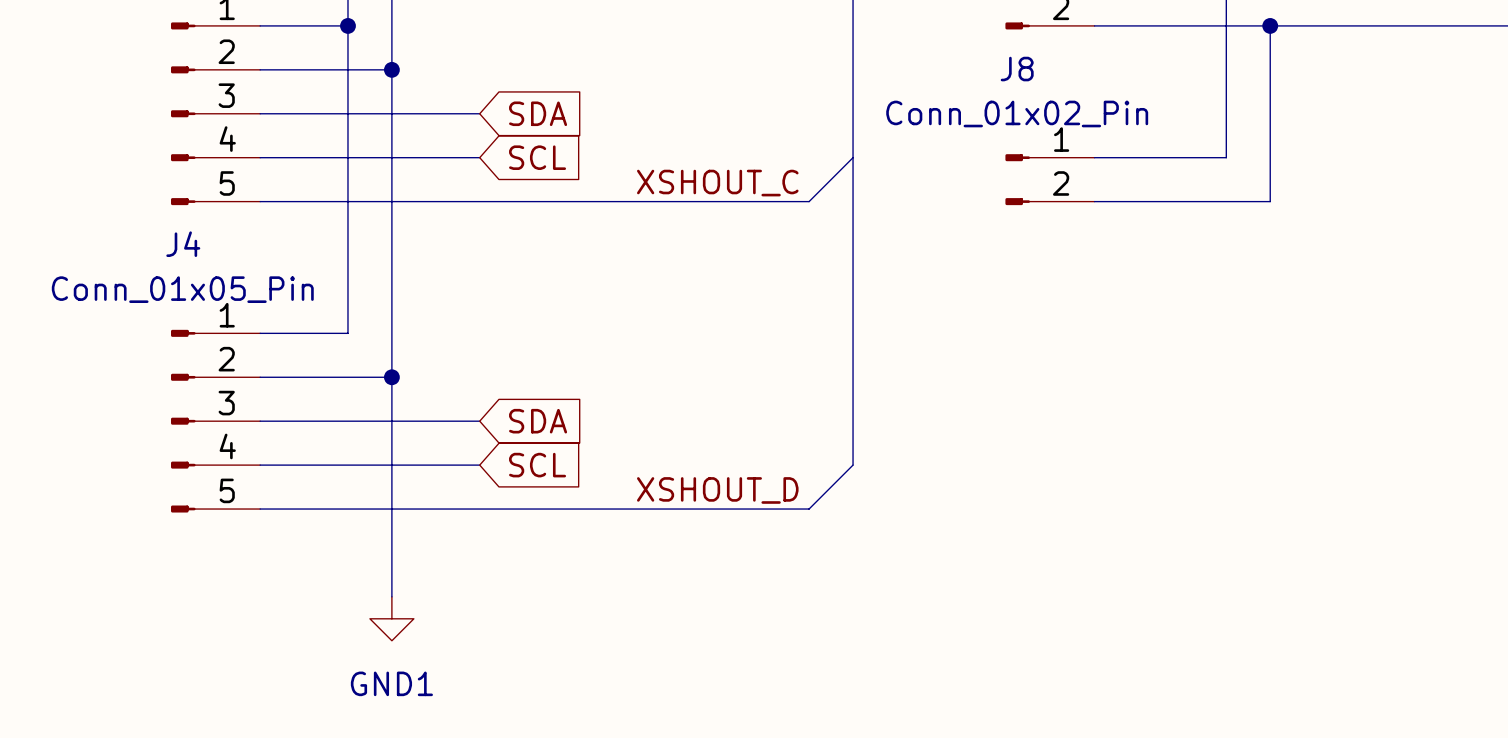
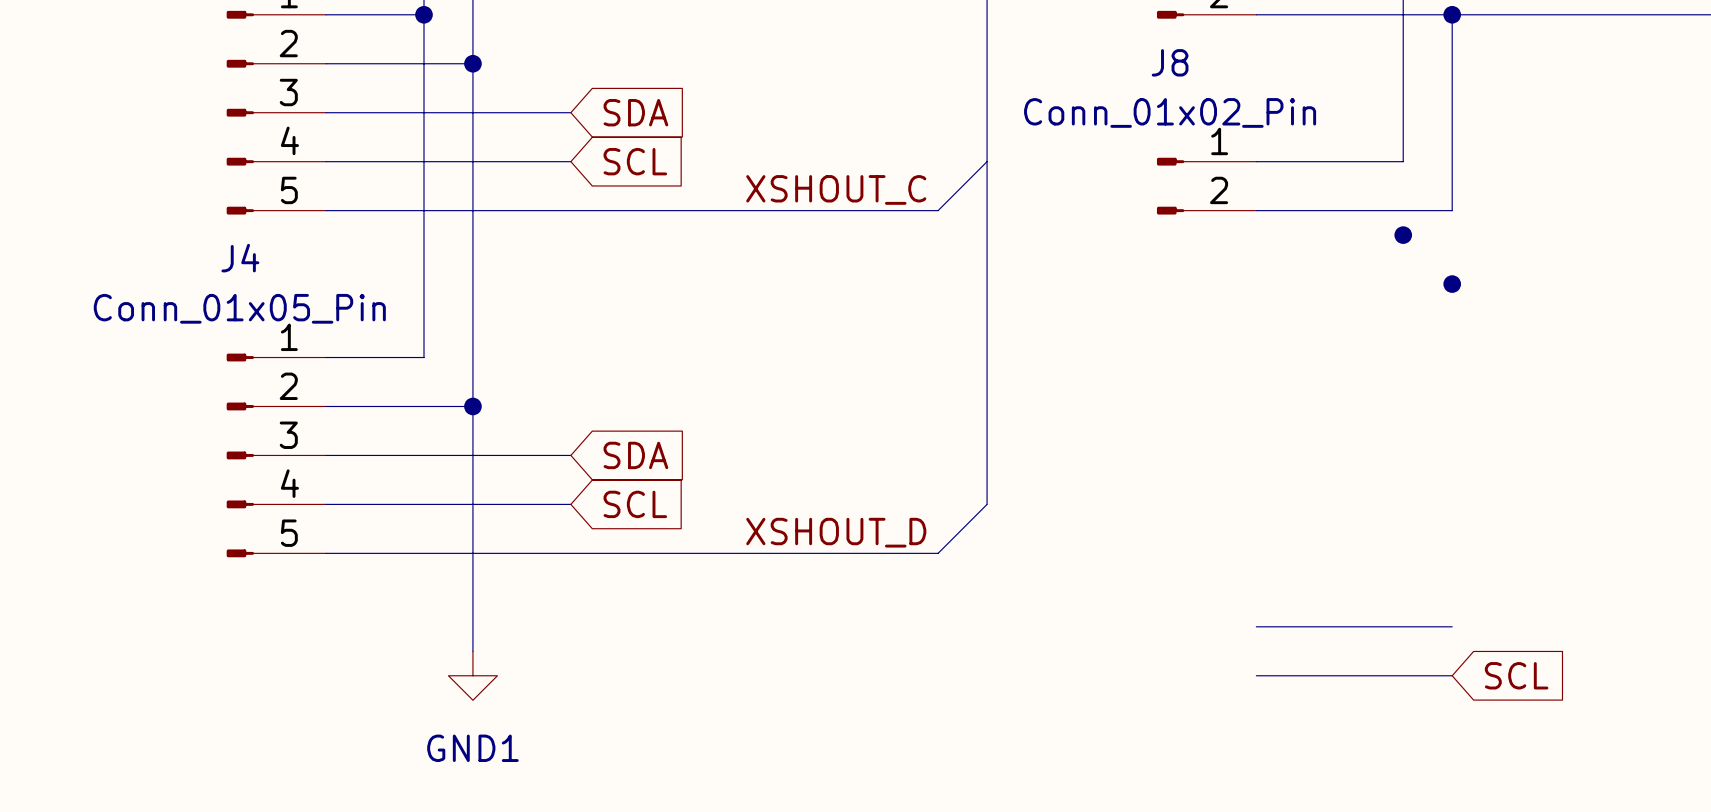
junction: none -> (1403, 235)
junction: none -> (1452, 284)
wire: none -> (1256, 626) (1452, 626)
wire: none -> (1256, 675) (1452, 675)
global label: none -> SCL (1516, 675)

